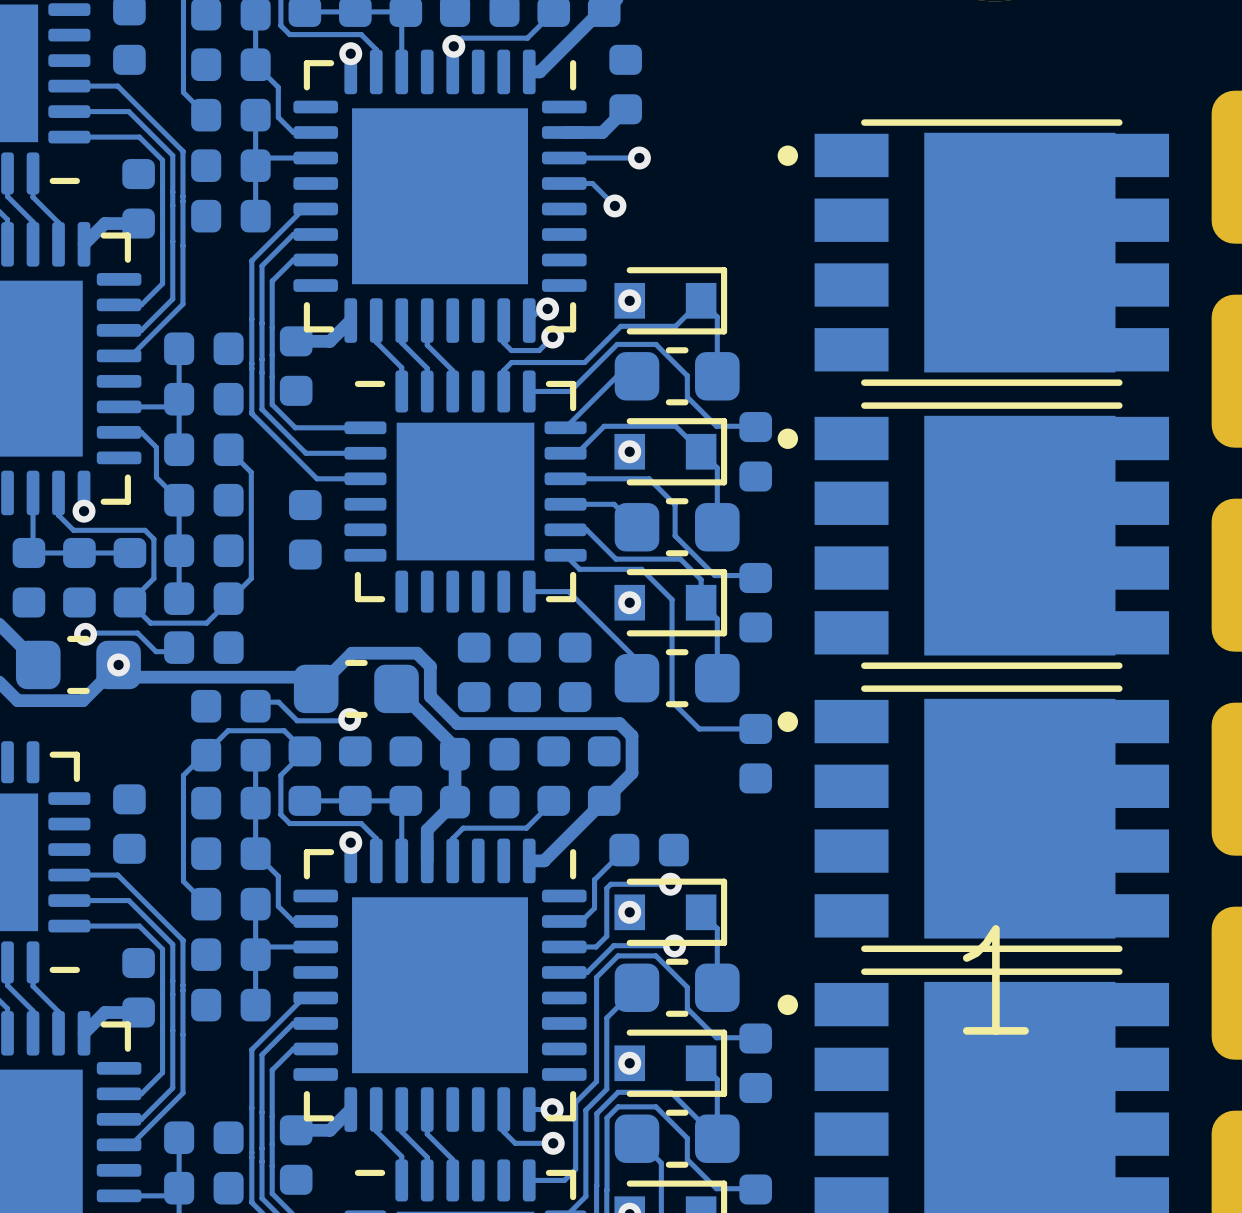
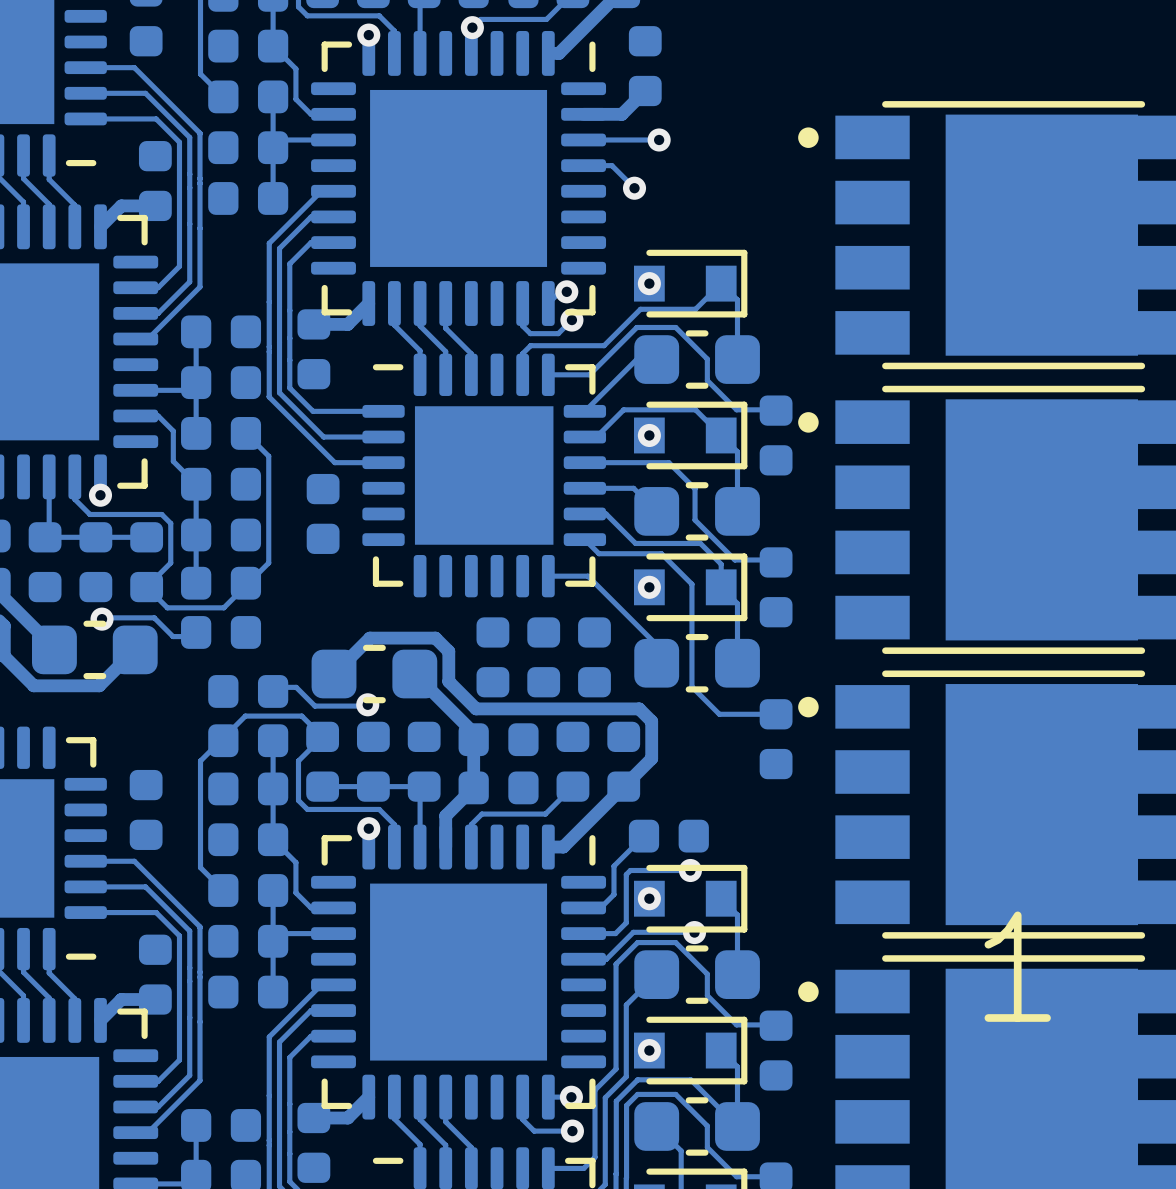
track: (118, 664) (130, 677) (304, 677) (316, 688) -> none
via: (118, 664) -> none

